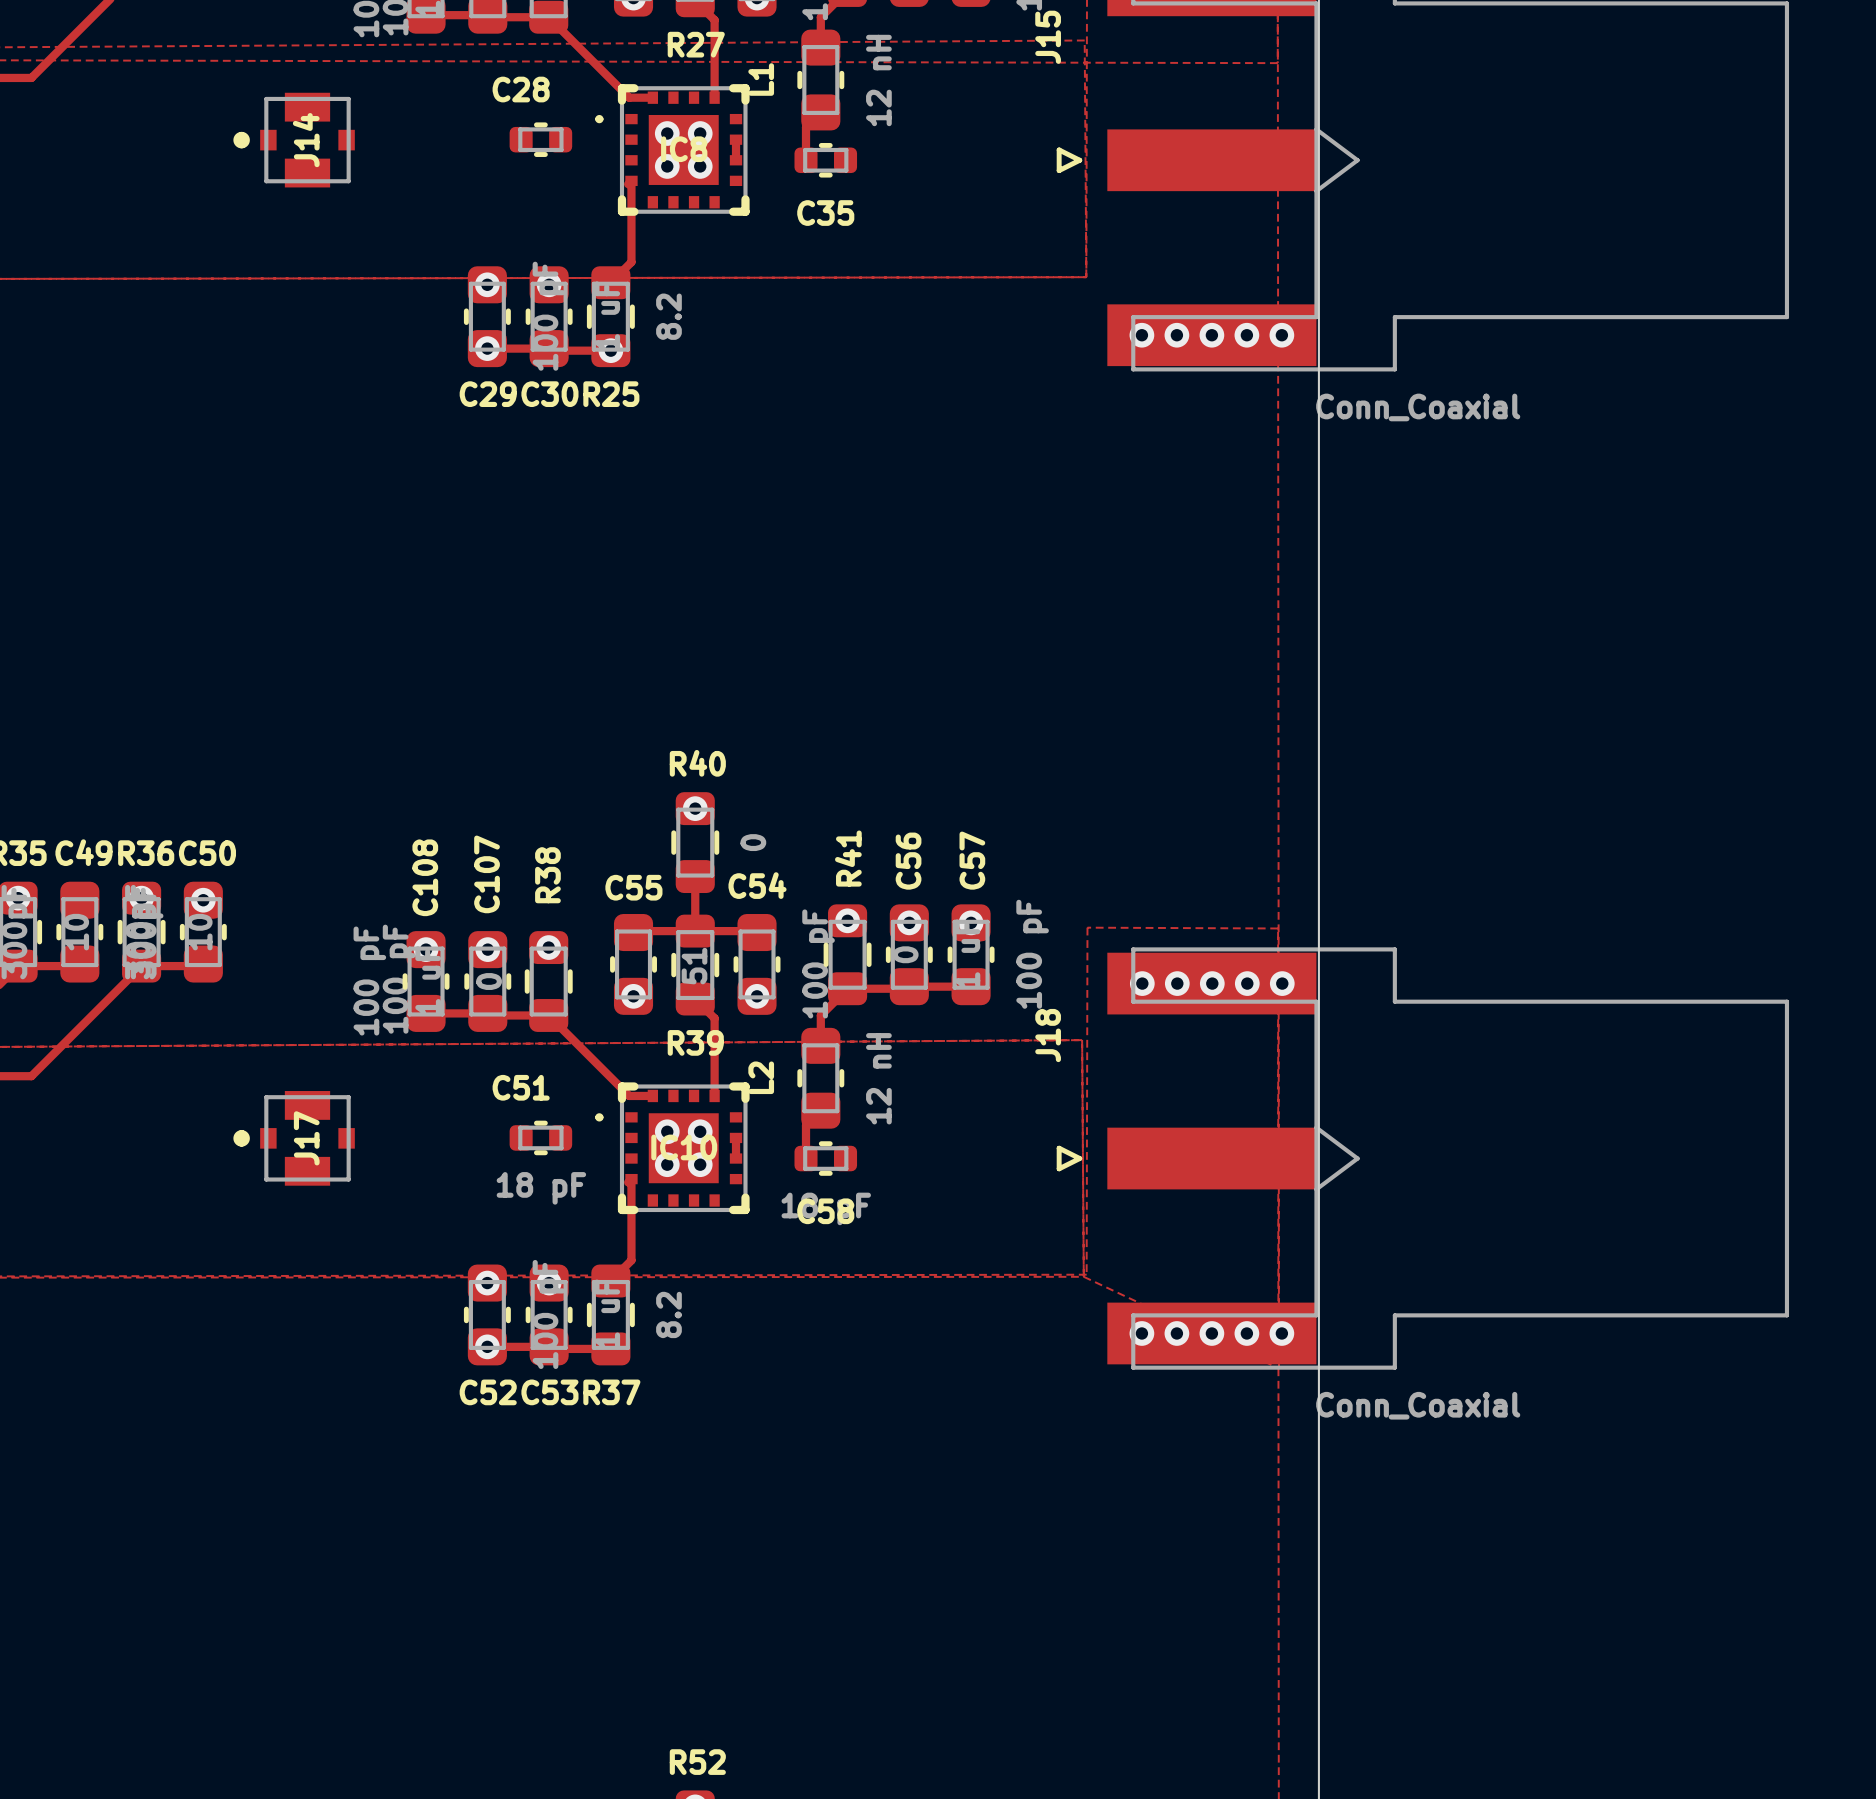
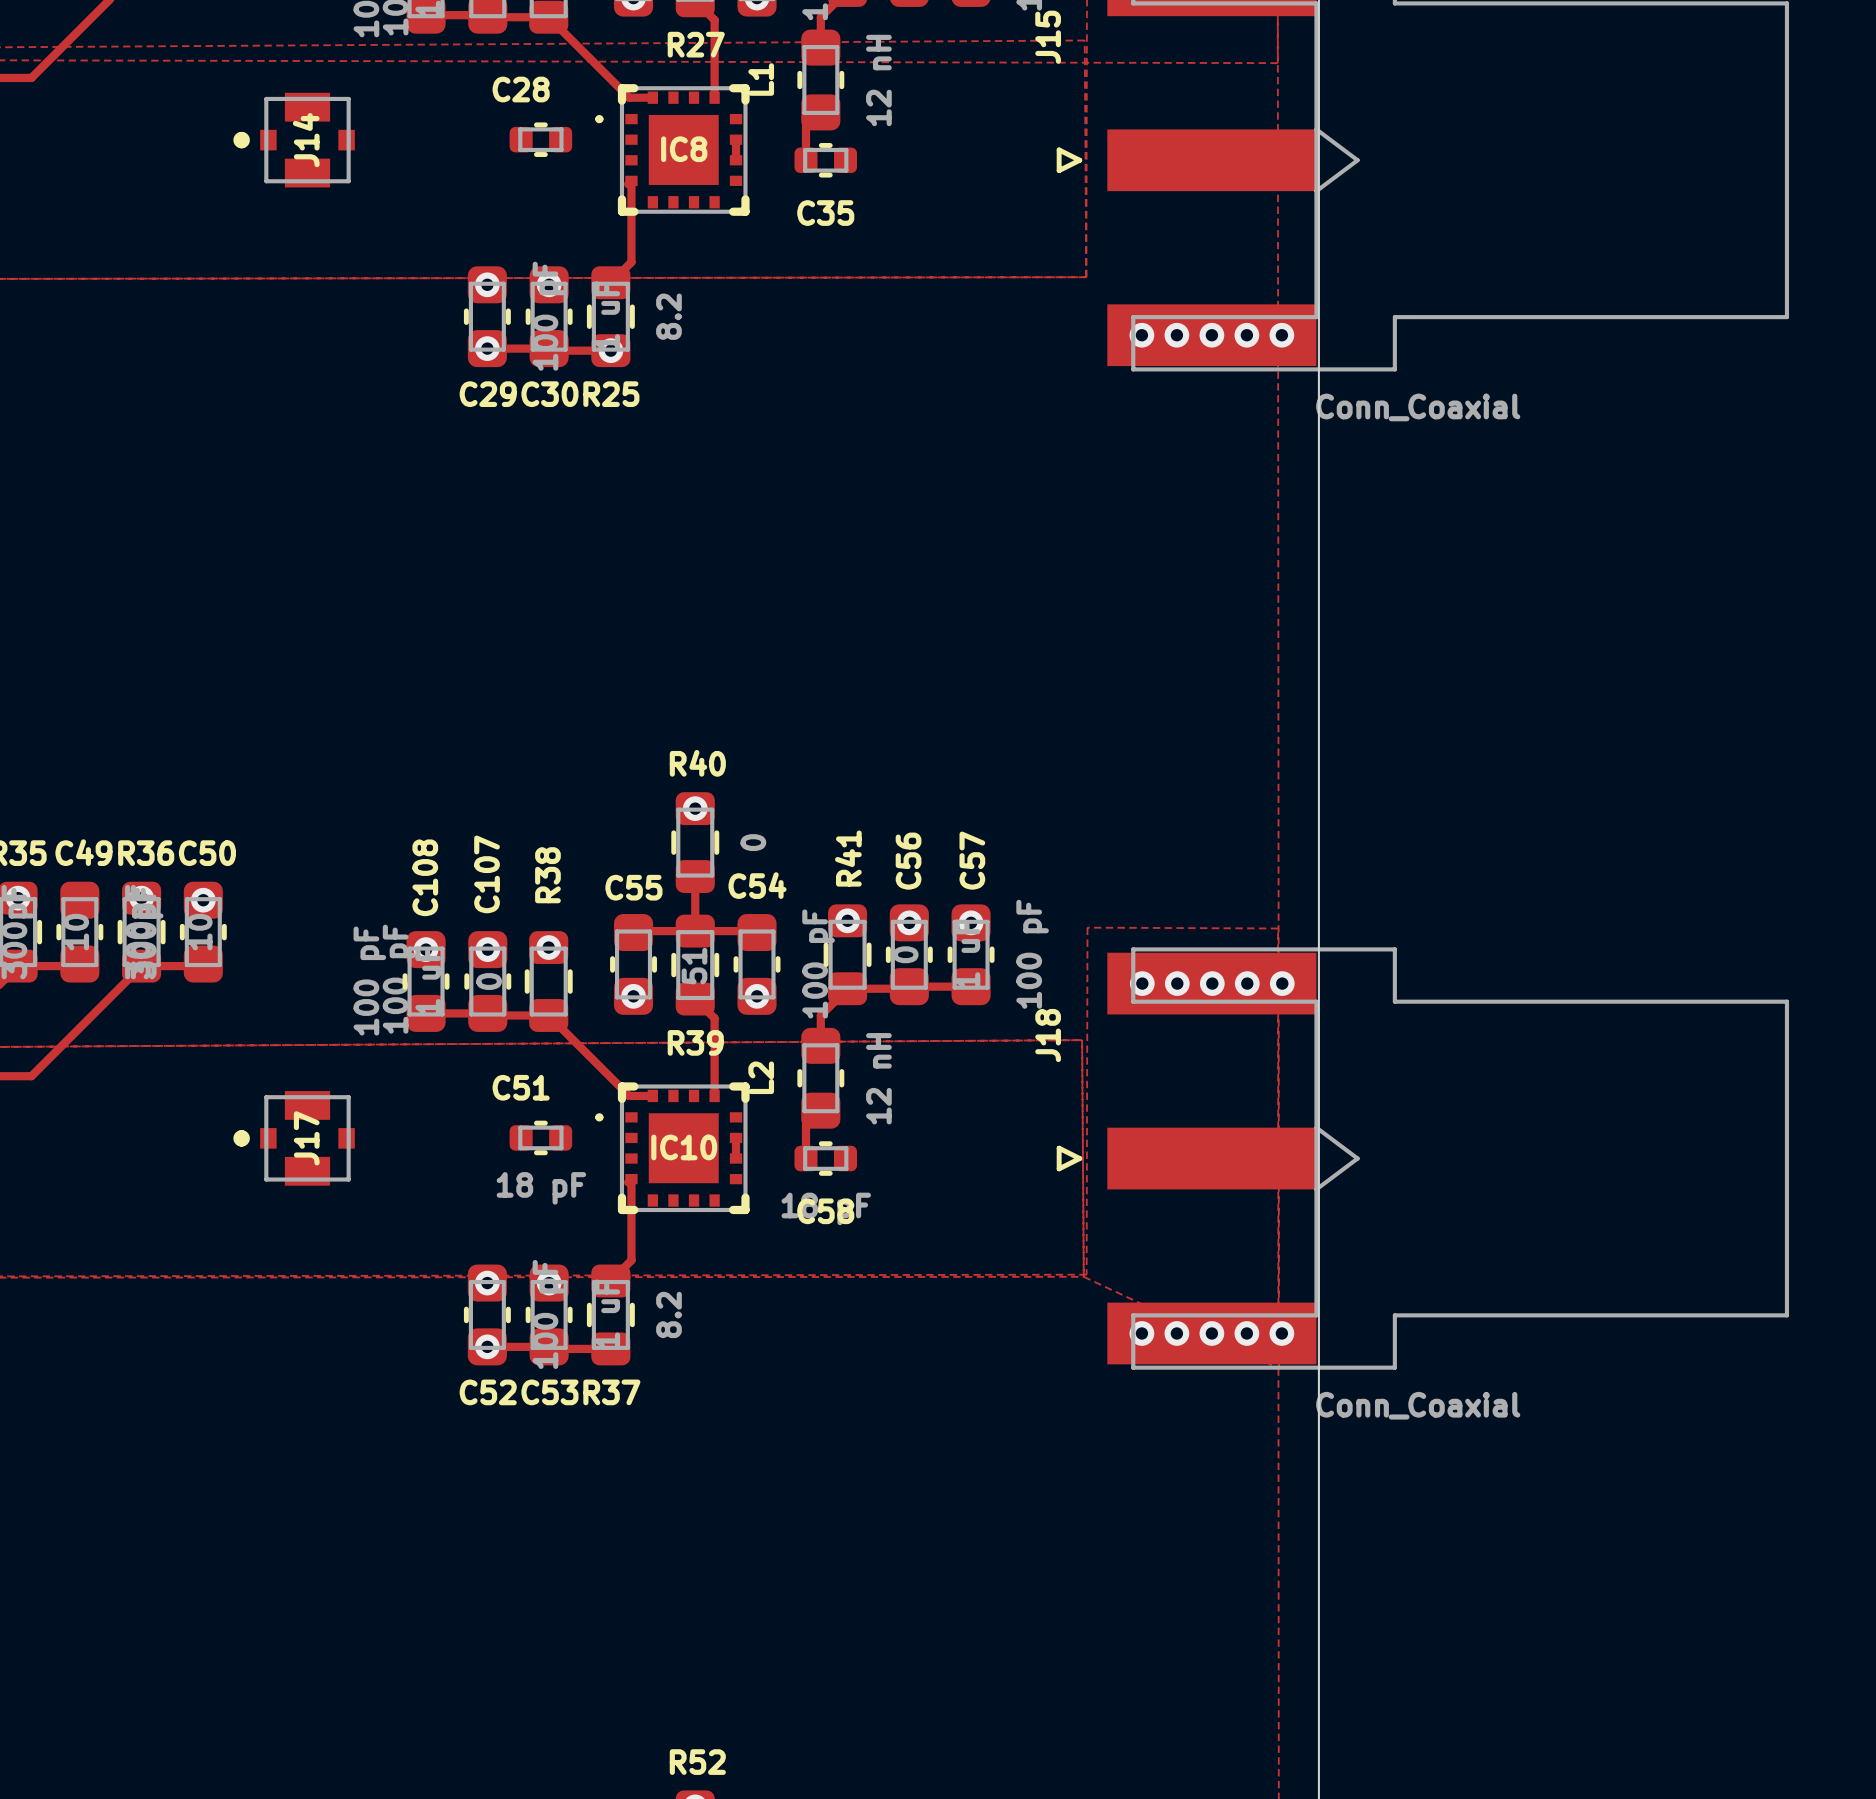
via: (667, 133) -> none
via: (700, 133) -> none
via: (667, 166) -> none
via: (700, 166) -> none
via: (667, 1131) -> none
via: (700, 1131) -> none
via: (667, 1164) -> none
via: (700, 1164) -> none

